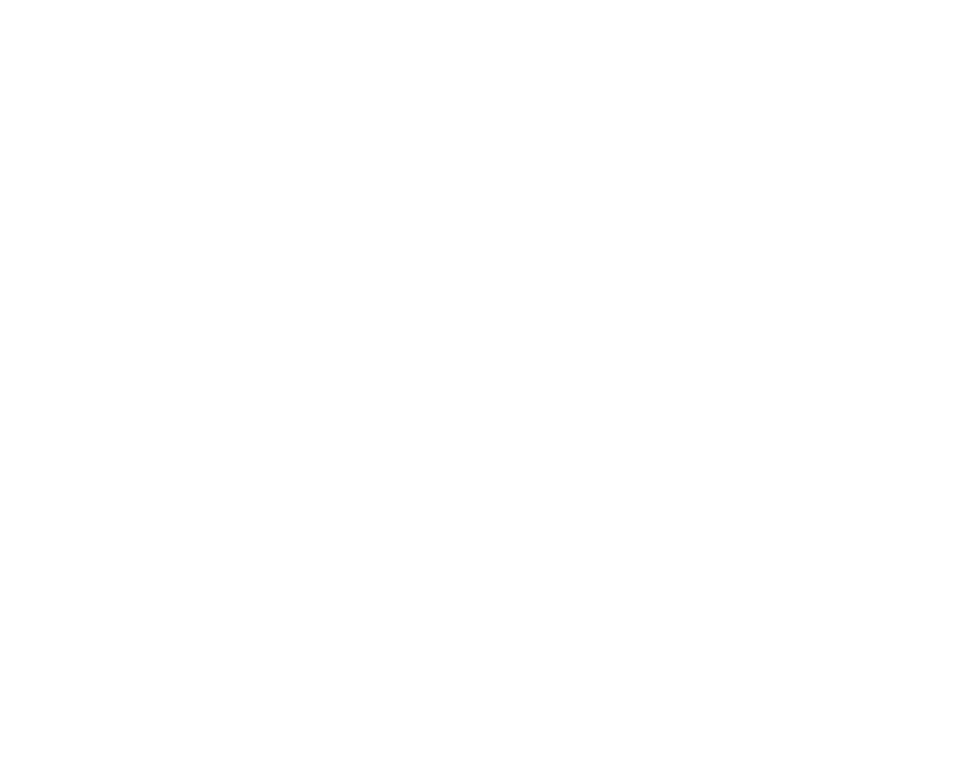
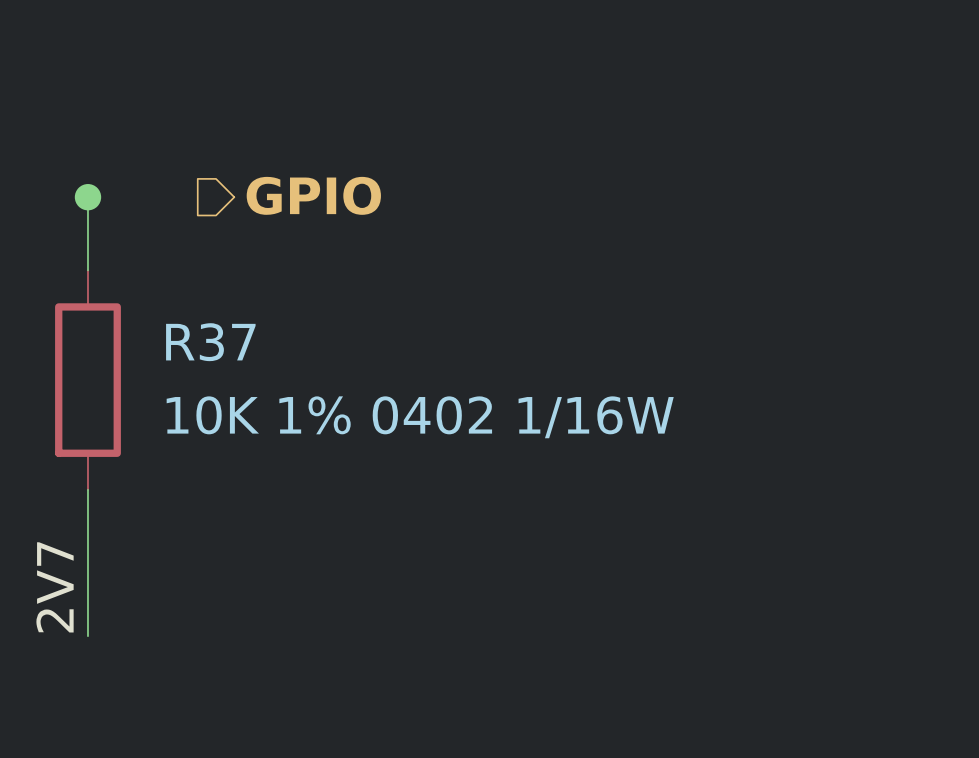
hierarchical label: none -> GPIO (313, 195)
wire: none -> (87, 197) (87, 270)
junction: none -> (87, 197)
R37: none -> 10K 1% 0402 1/16W (87, 380)
wire: none -> (87, 489) (87, 636)
label: none -> 2V7 (55, 587)

